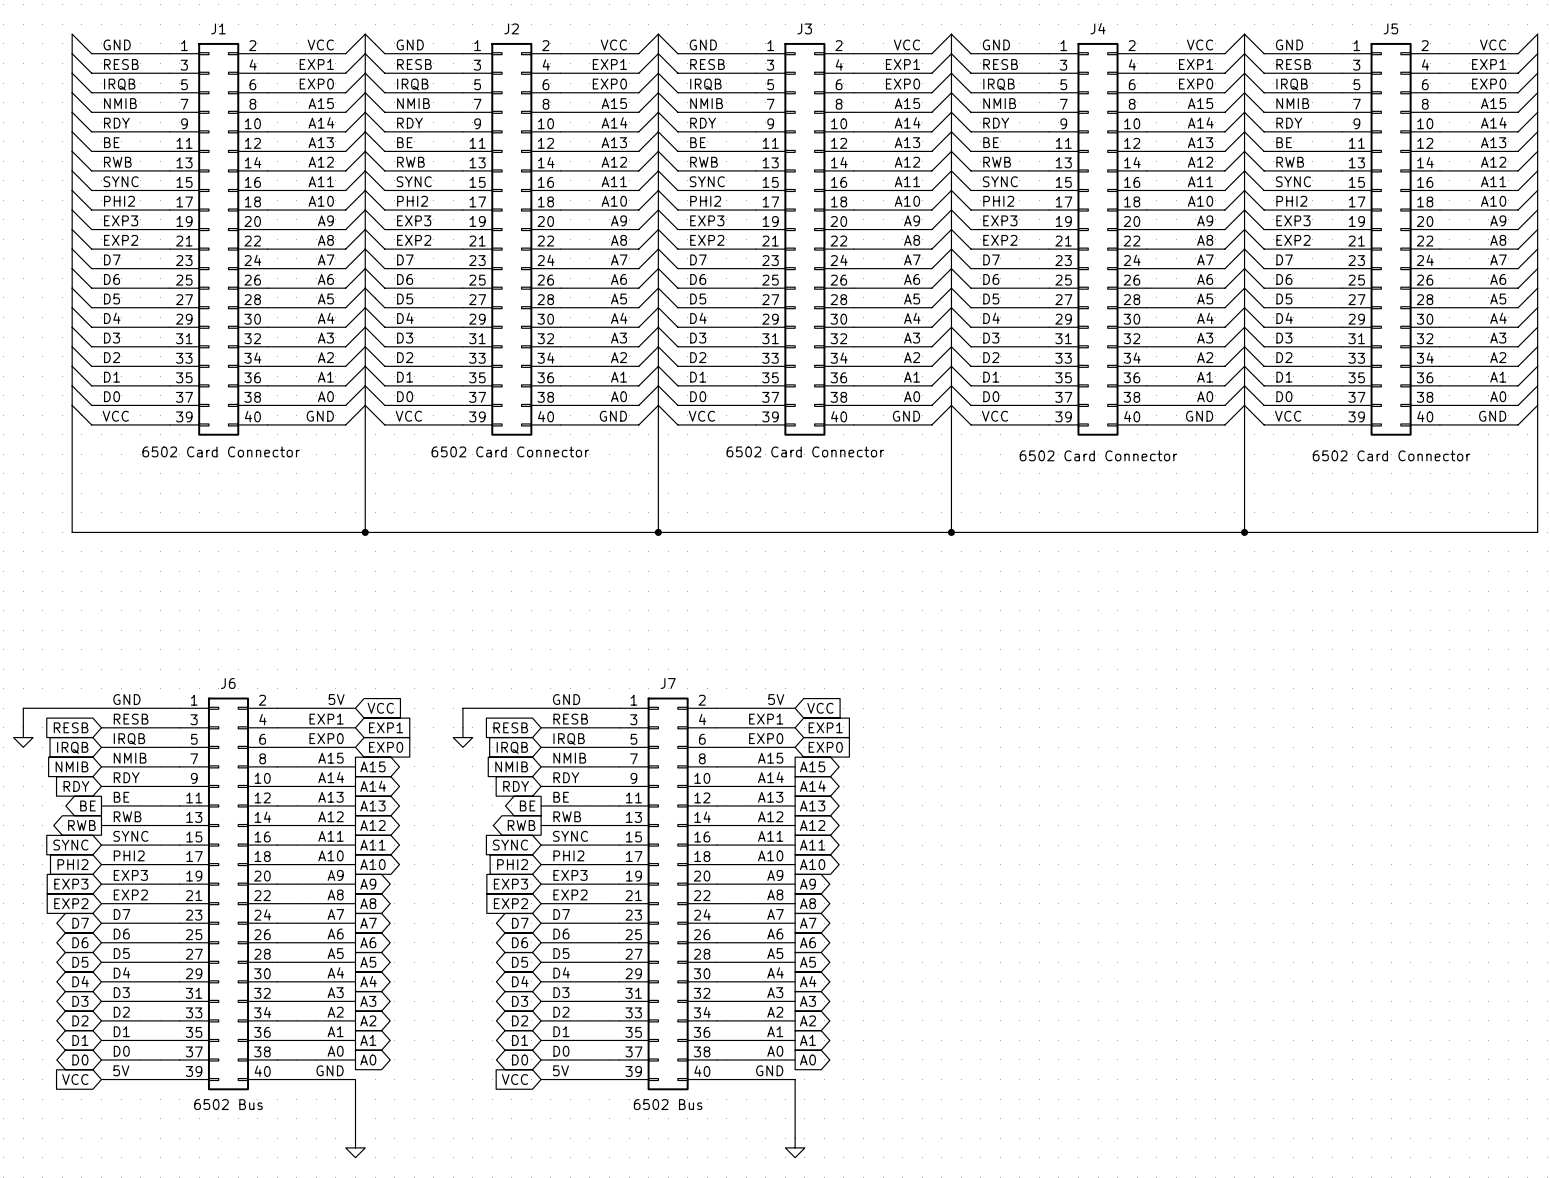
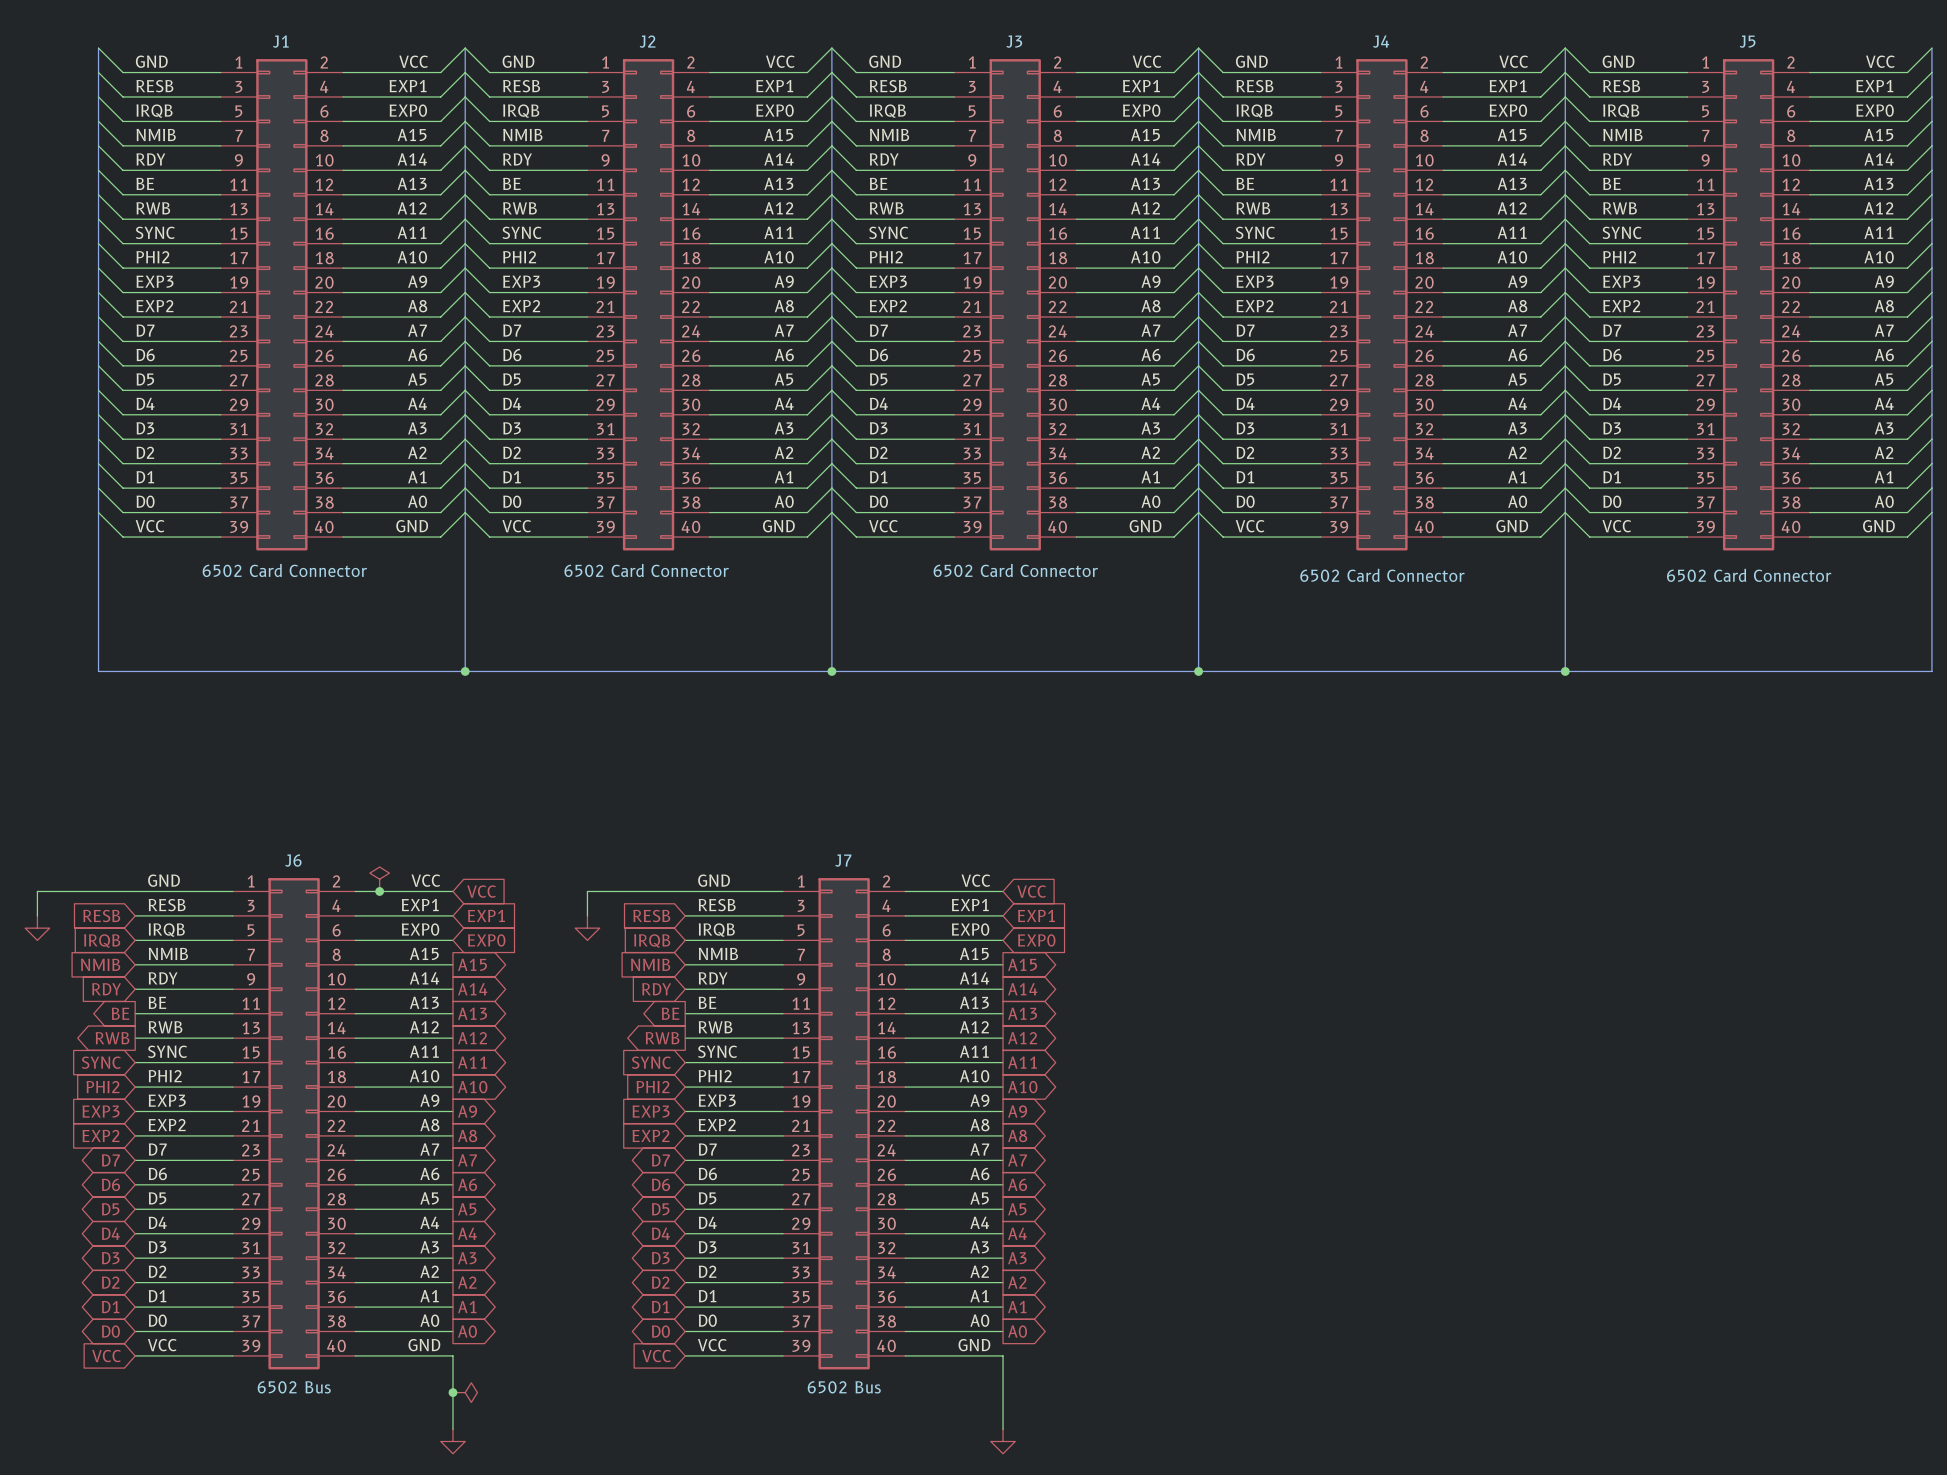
power symbol: none -> (379, 879)
label: 5V (336, 699) -> VCC (425, 880)
label: 5V (776, 699) -> VCC (975, 880)
junction: none -> (379, 891)
label: 5V (121, 1070) -> VCC (162, 1345)
label: 5V (560, 1070) -> VCC (712, 1345)
junction: none -> (452, 1392)
power symbol: none -> (465, 1392)

